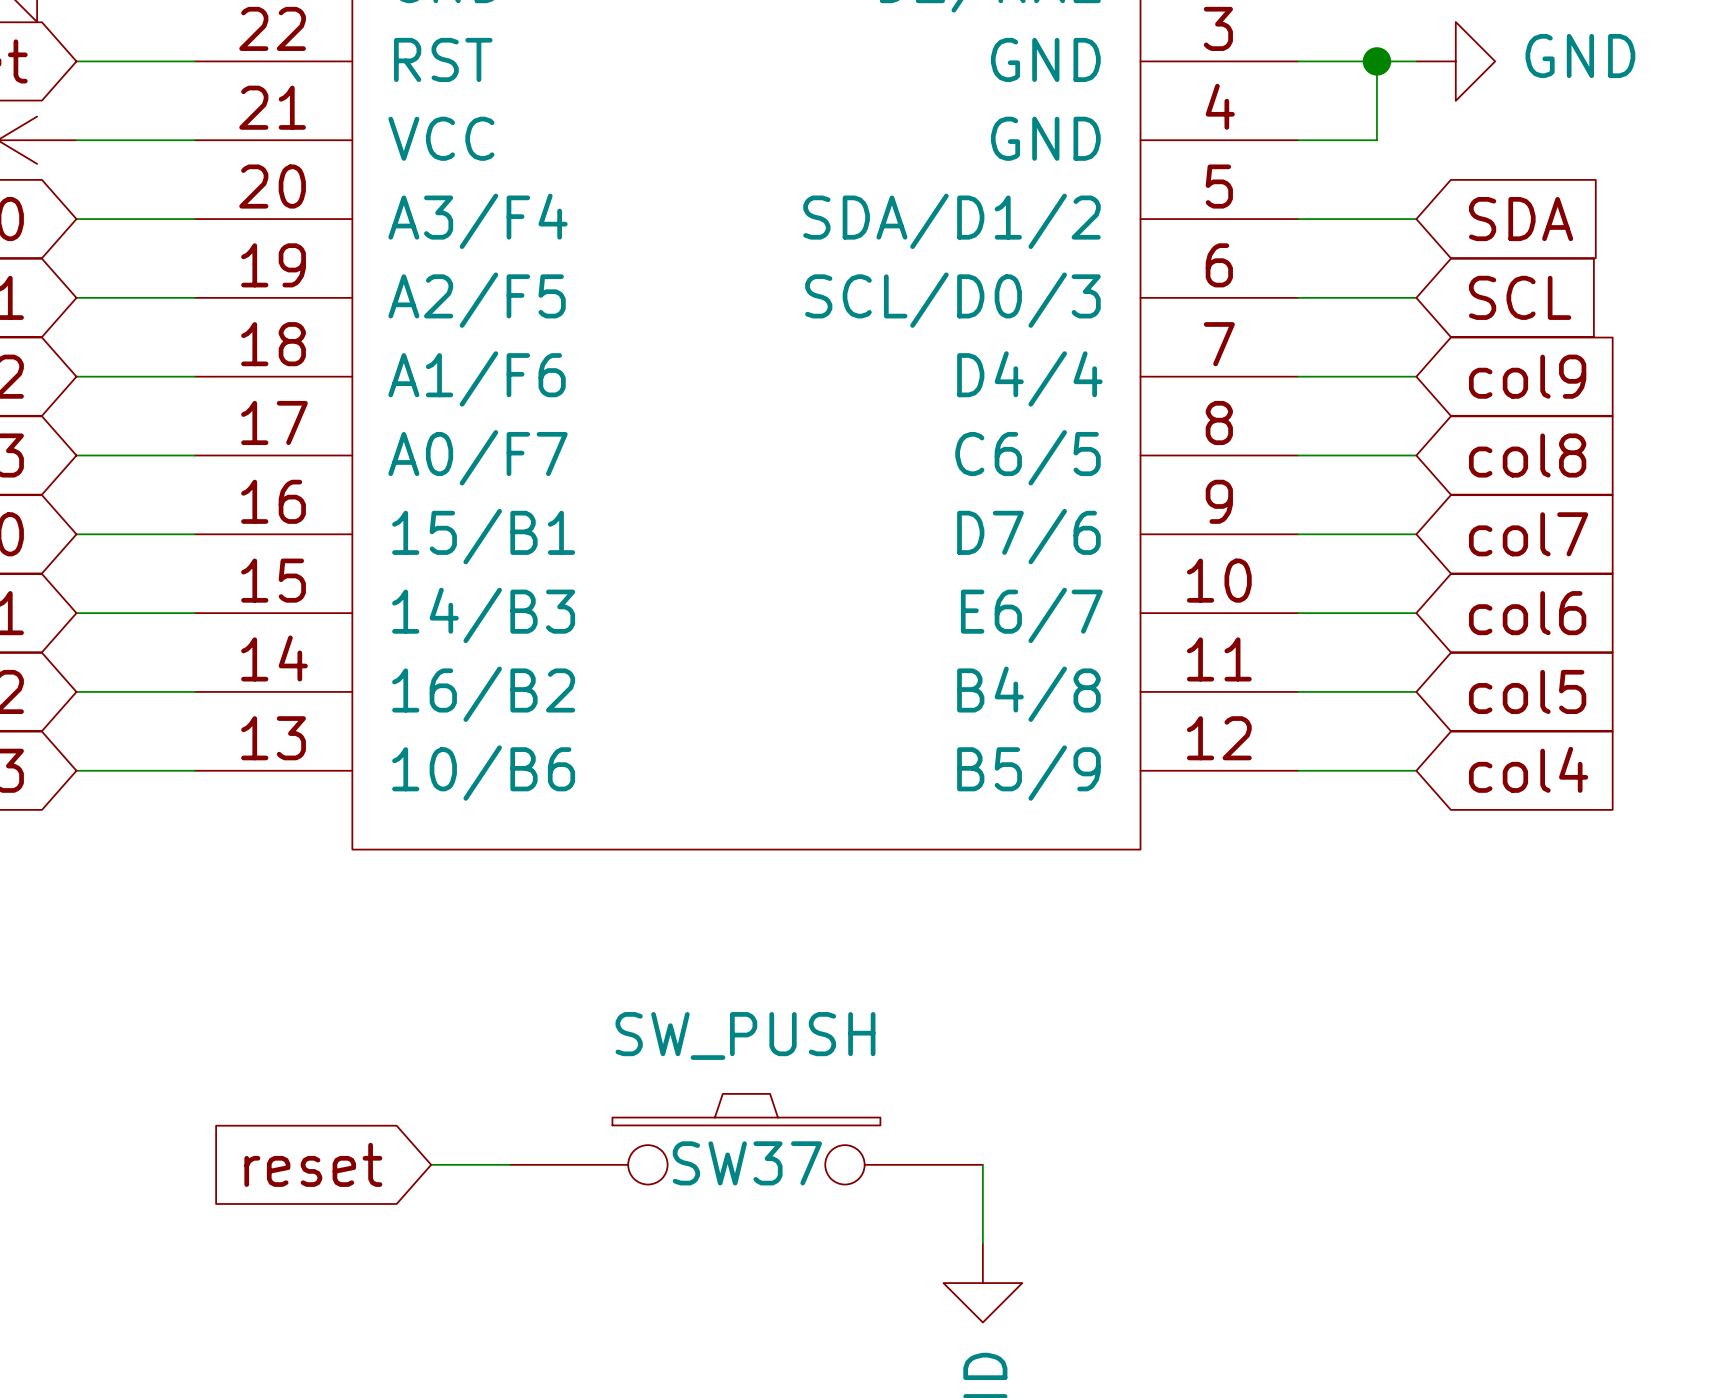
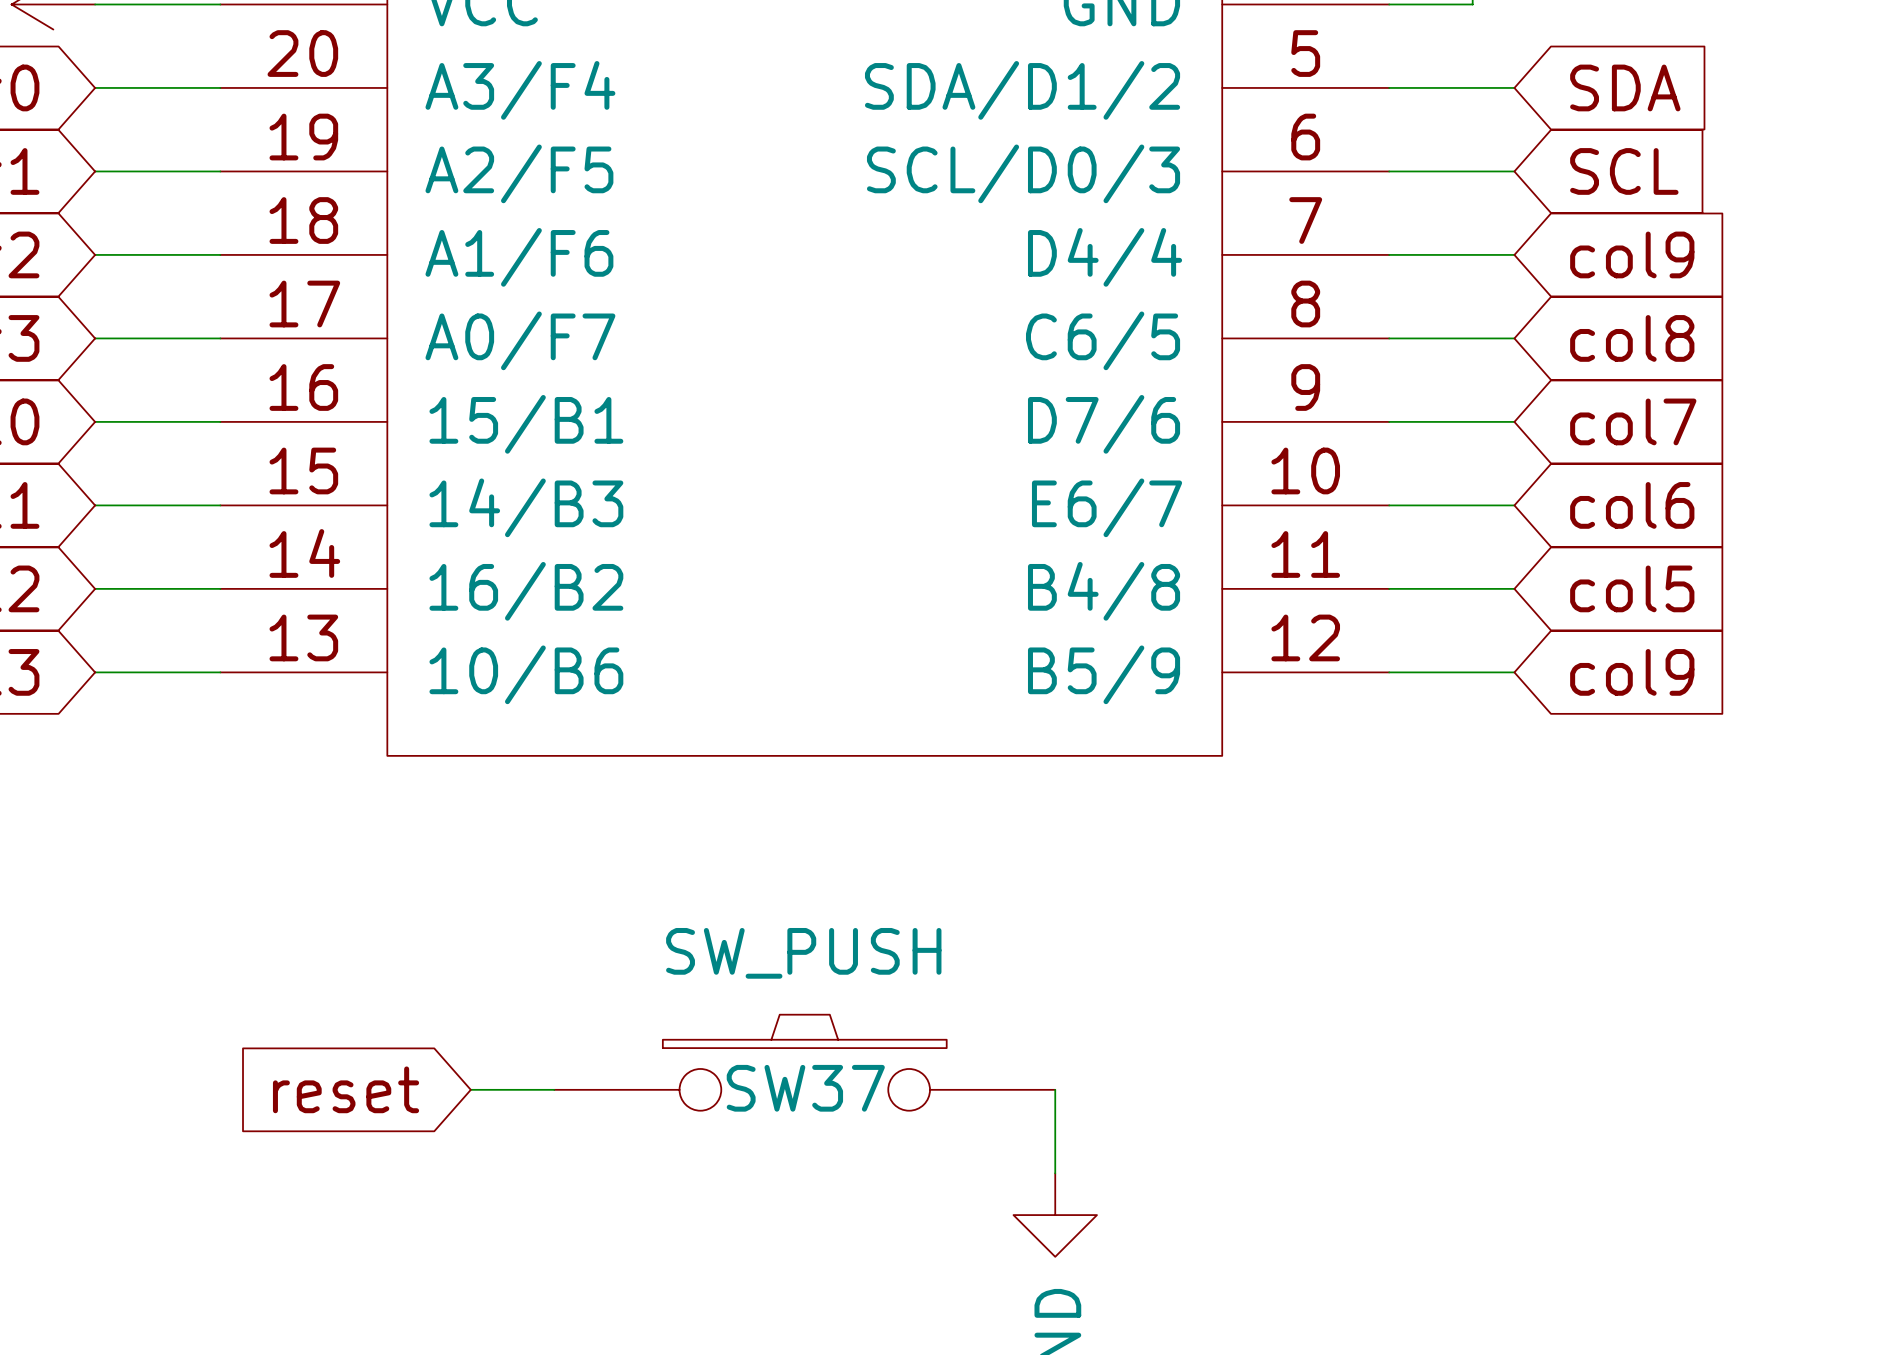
global label: col4 (1528, 769) -> col9 (1632, 672)

